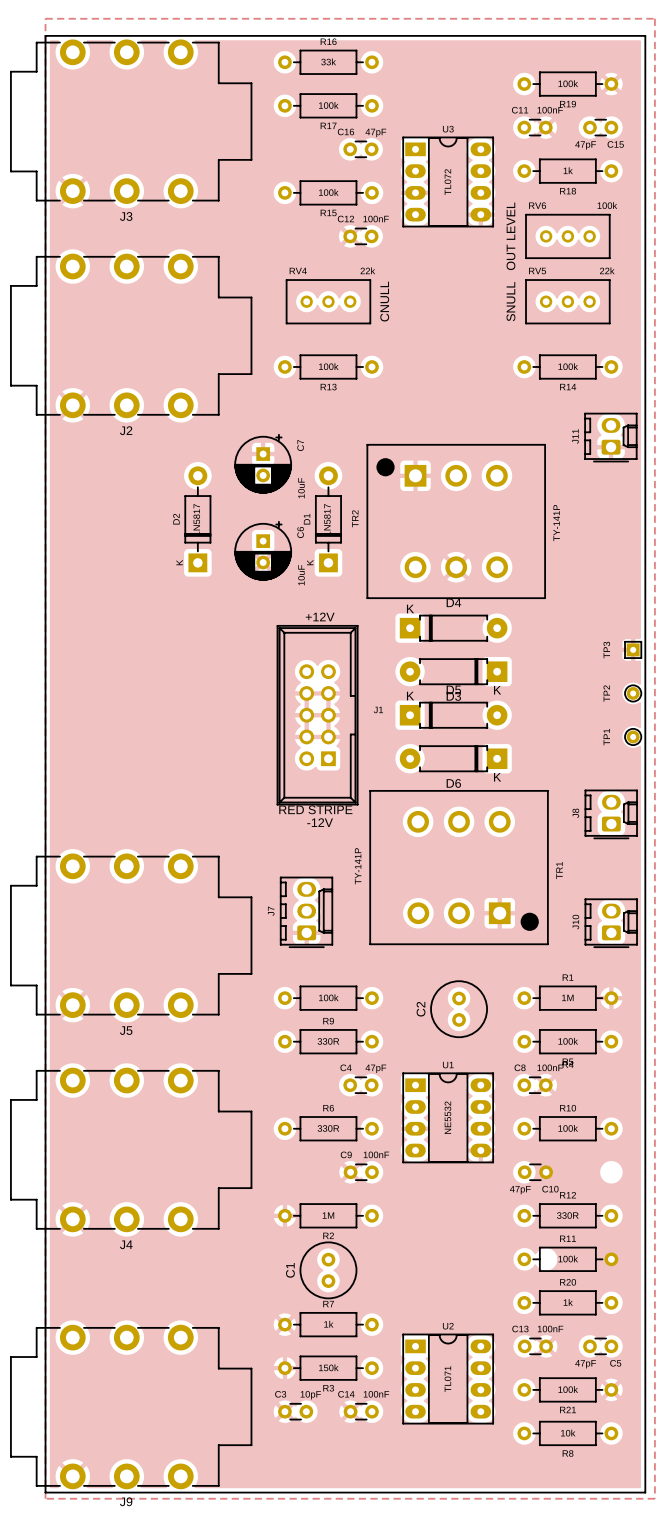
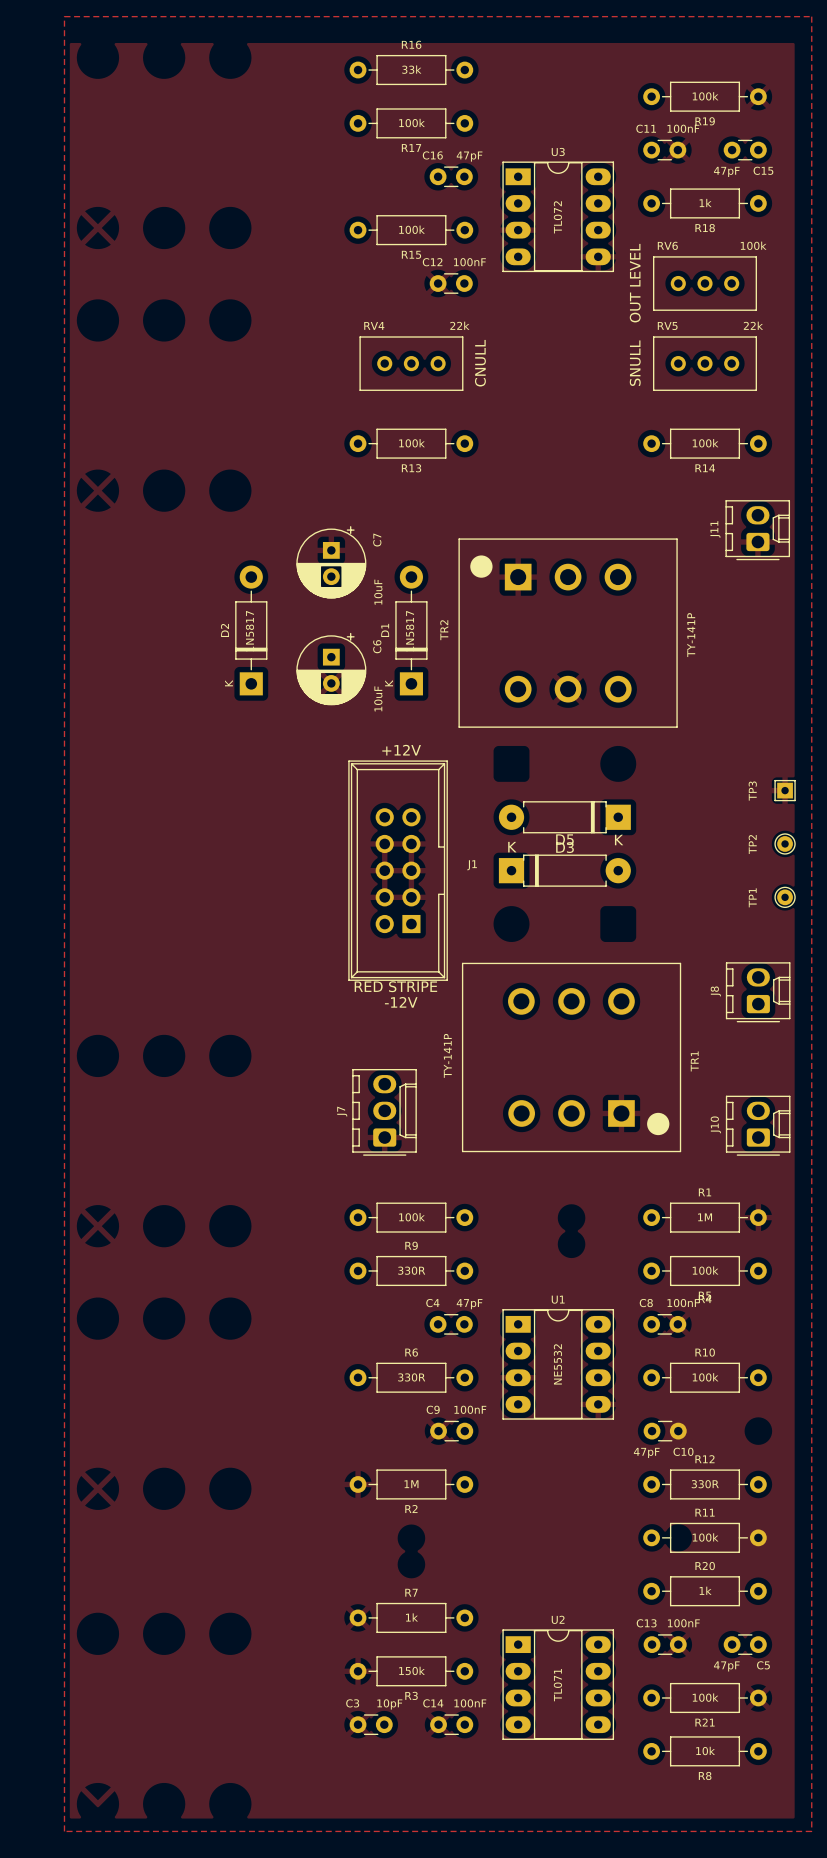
board edge: (45, 35) (45, 1492) (645, 1492) (645, 35) (45, 35) -> none
J3: (131, 121) -> none
J2: (131, 335) -> none
D4: (453, 628) -> none
D6: (453, 758) -> none
J5: (131, 935) -> none
C2: (459, 1009) -> none
J4: (131, 1149) -> none
C1: (328, 1270) -> none
J9: (131, 1407) -> none

